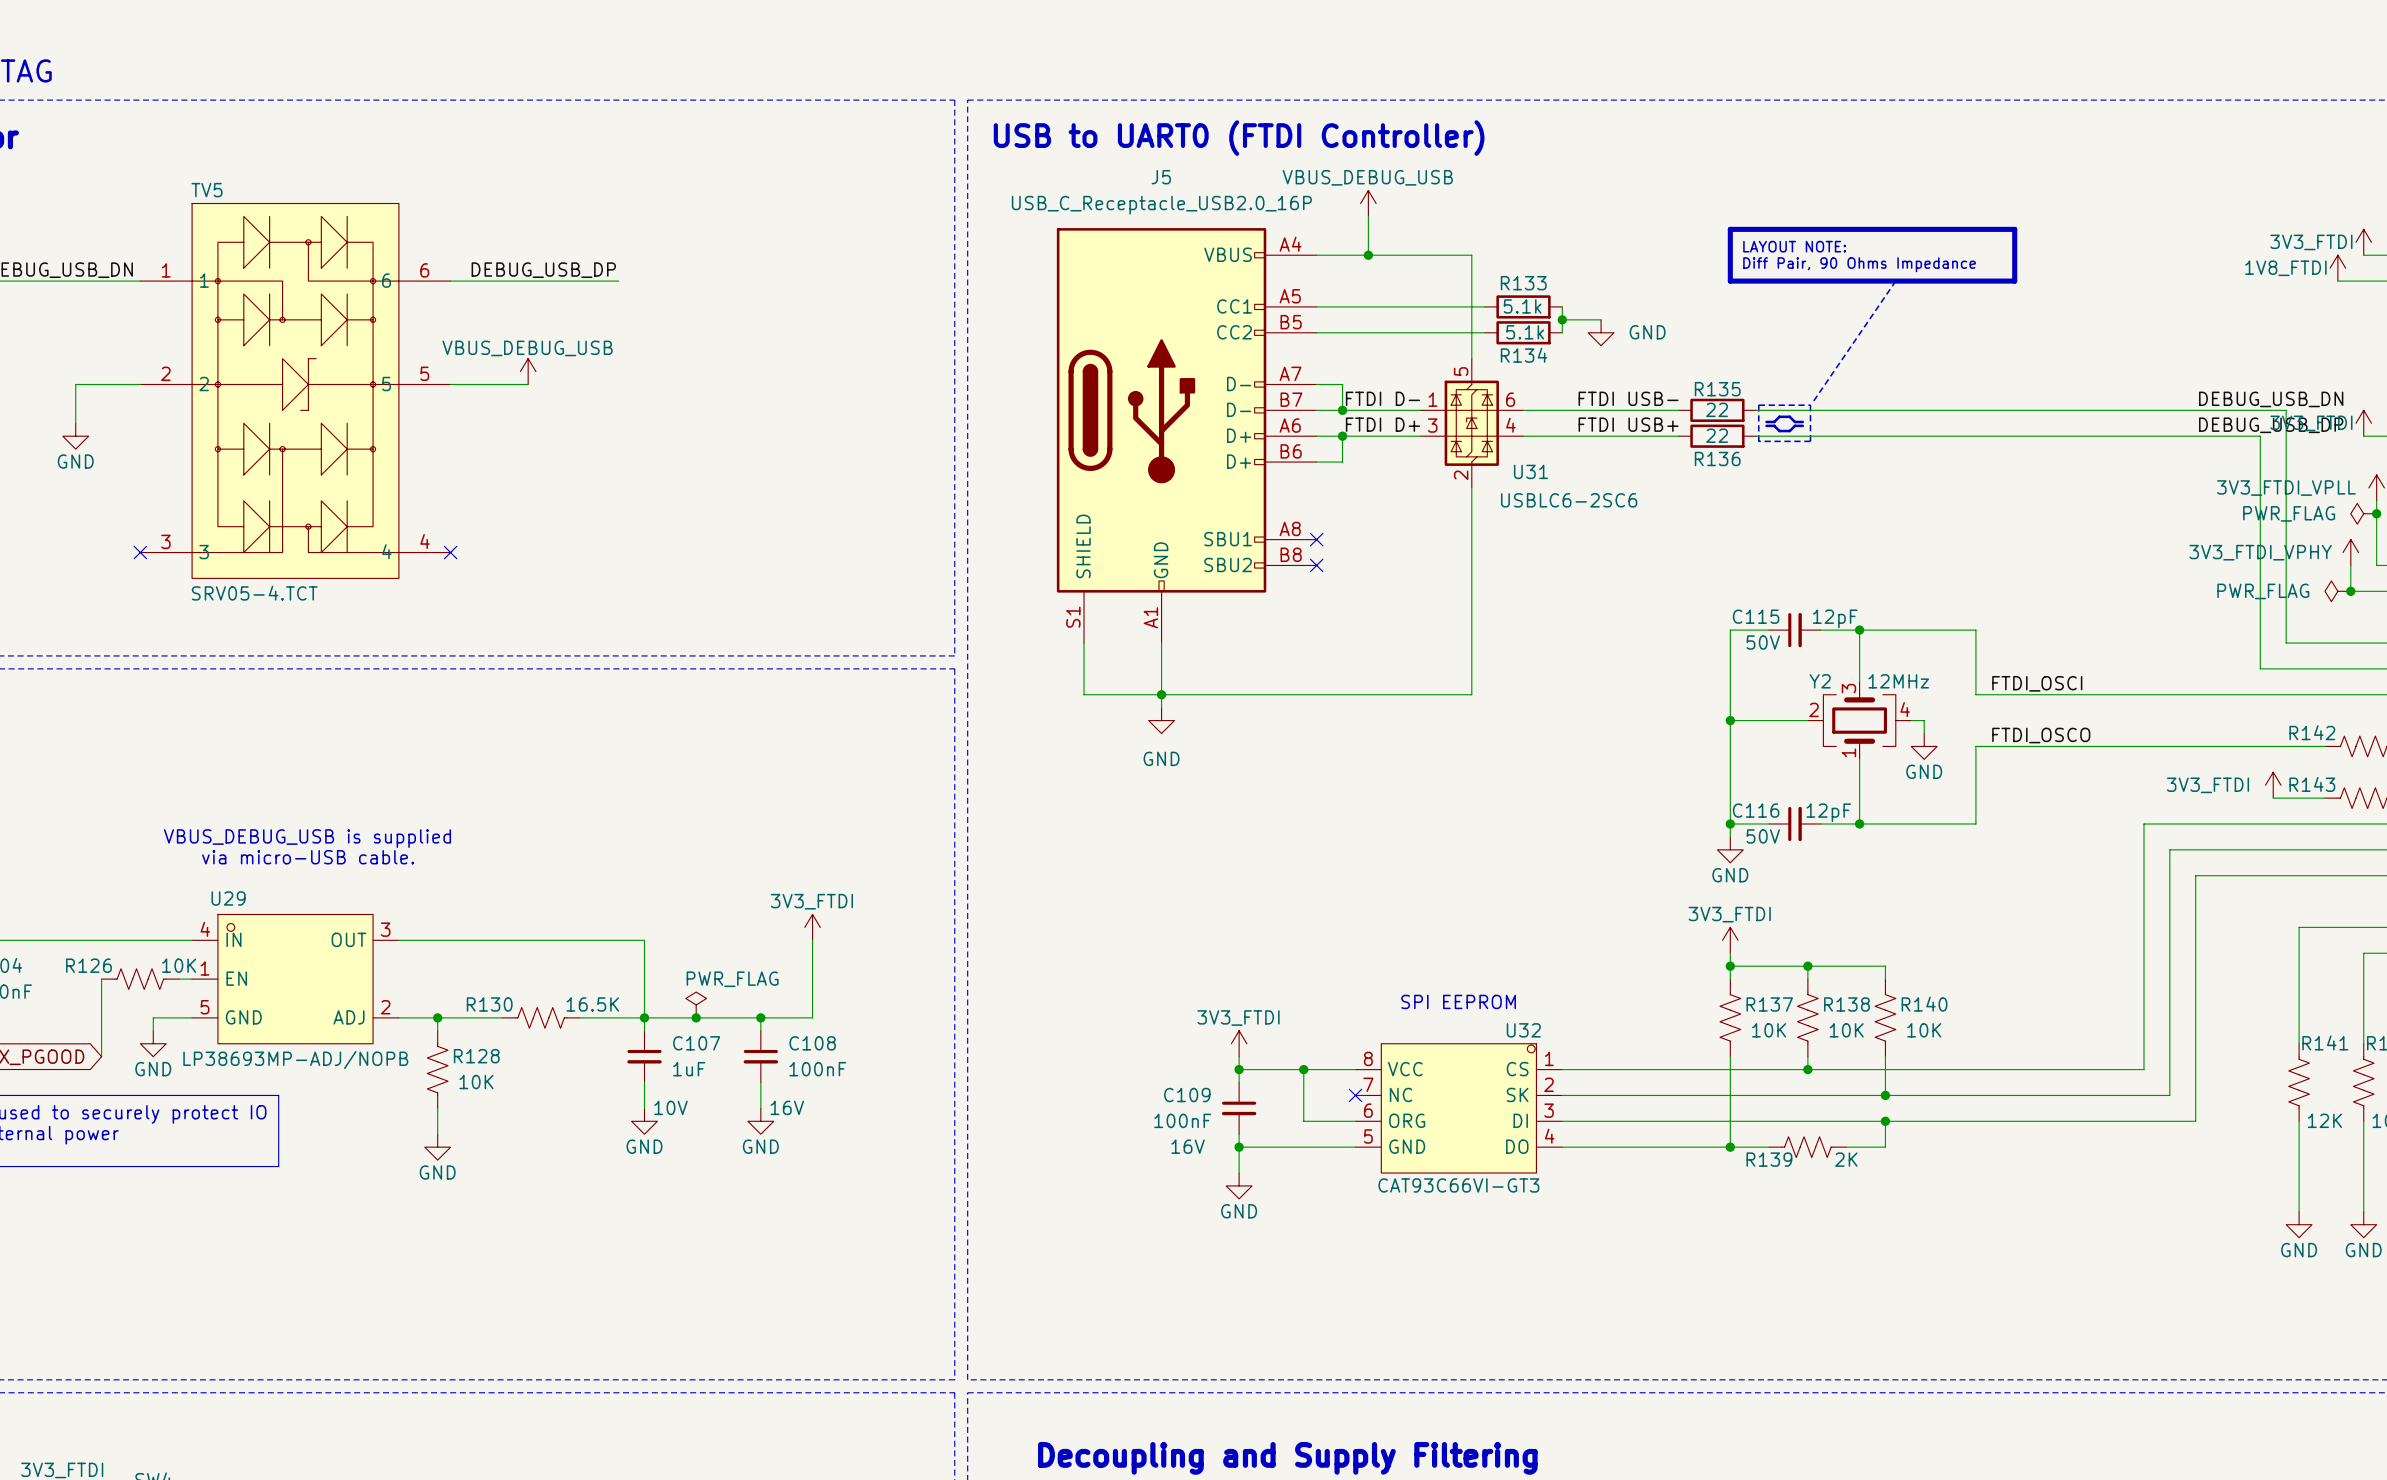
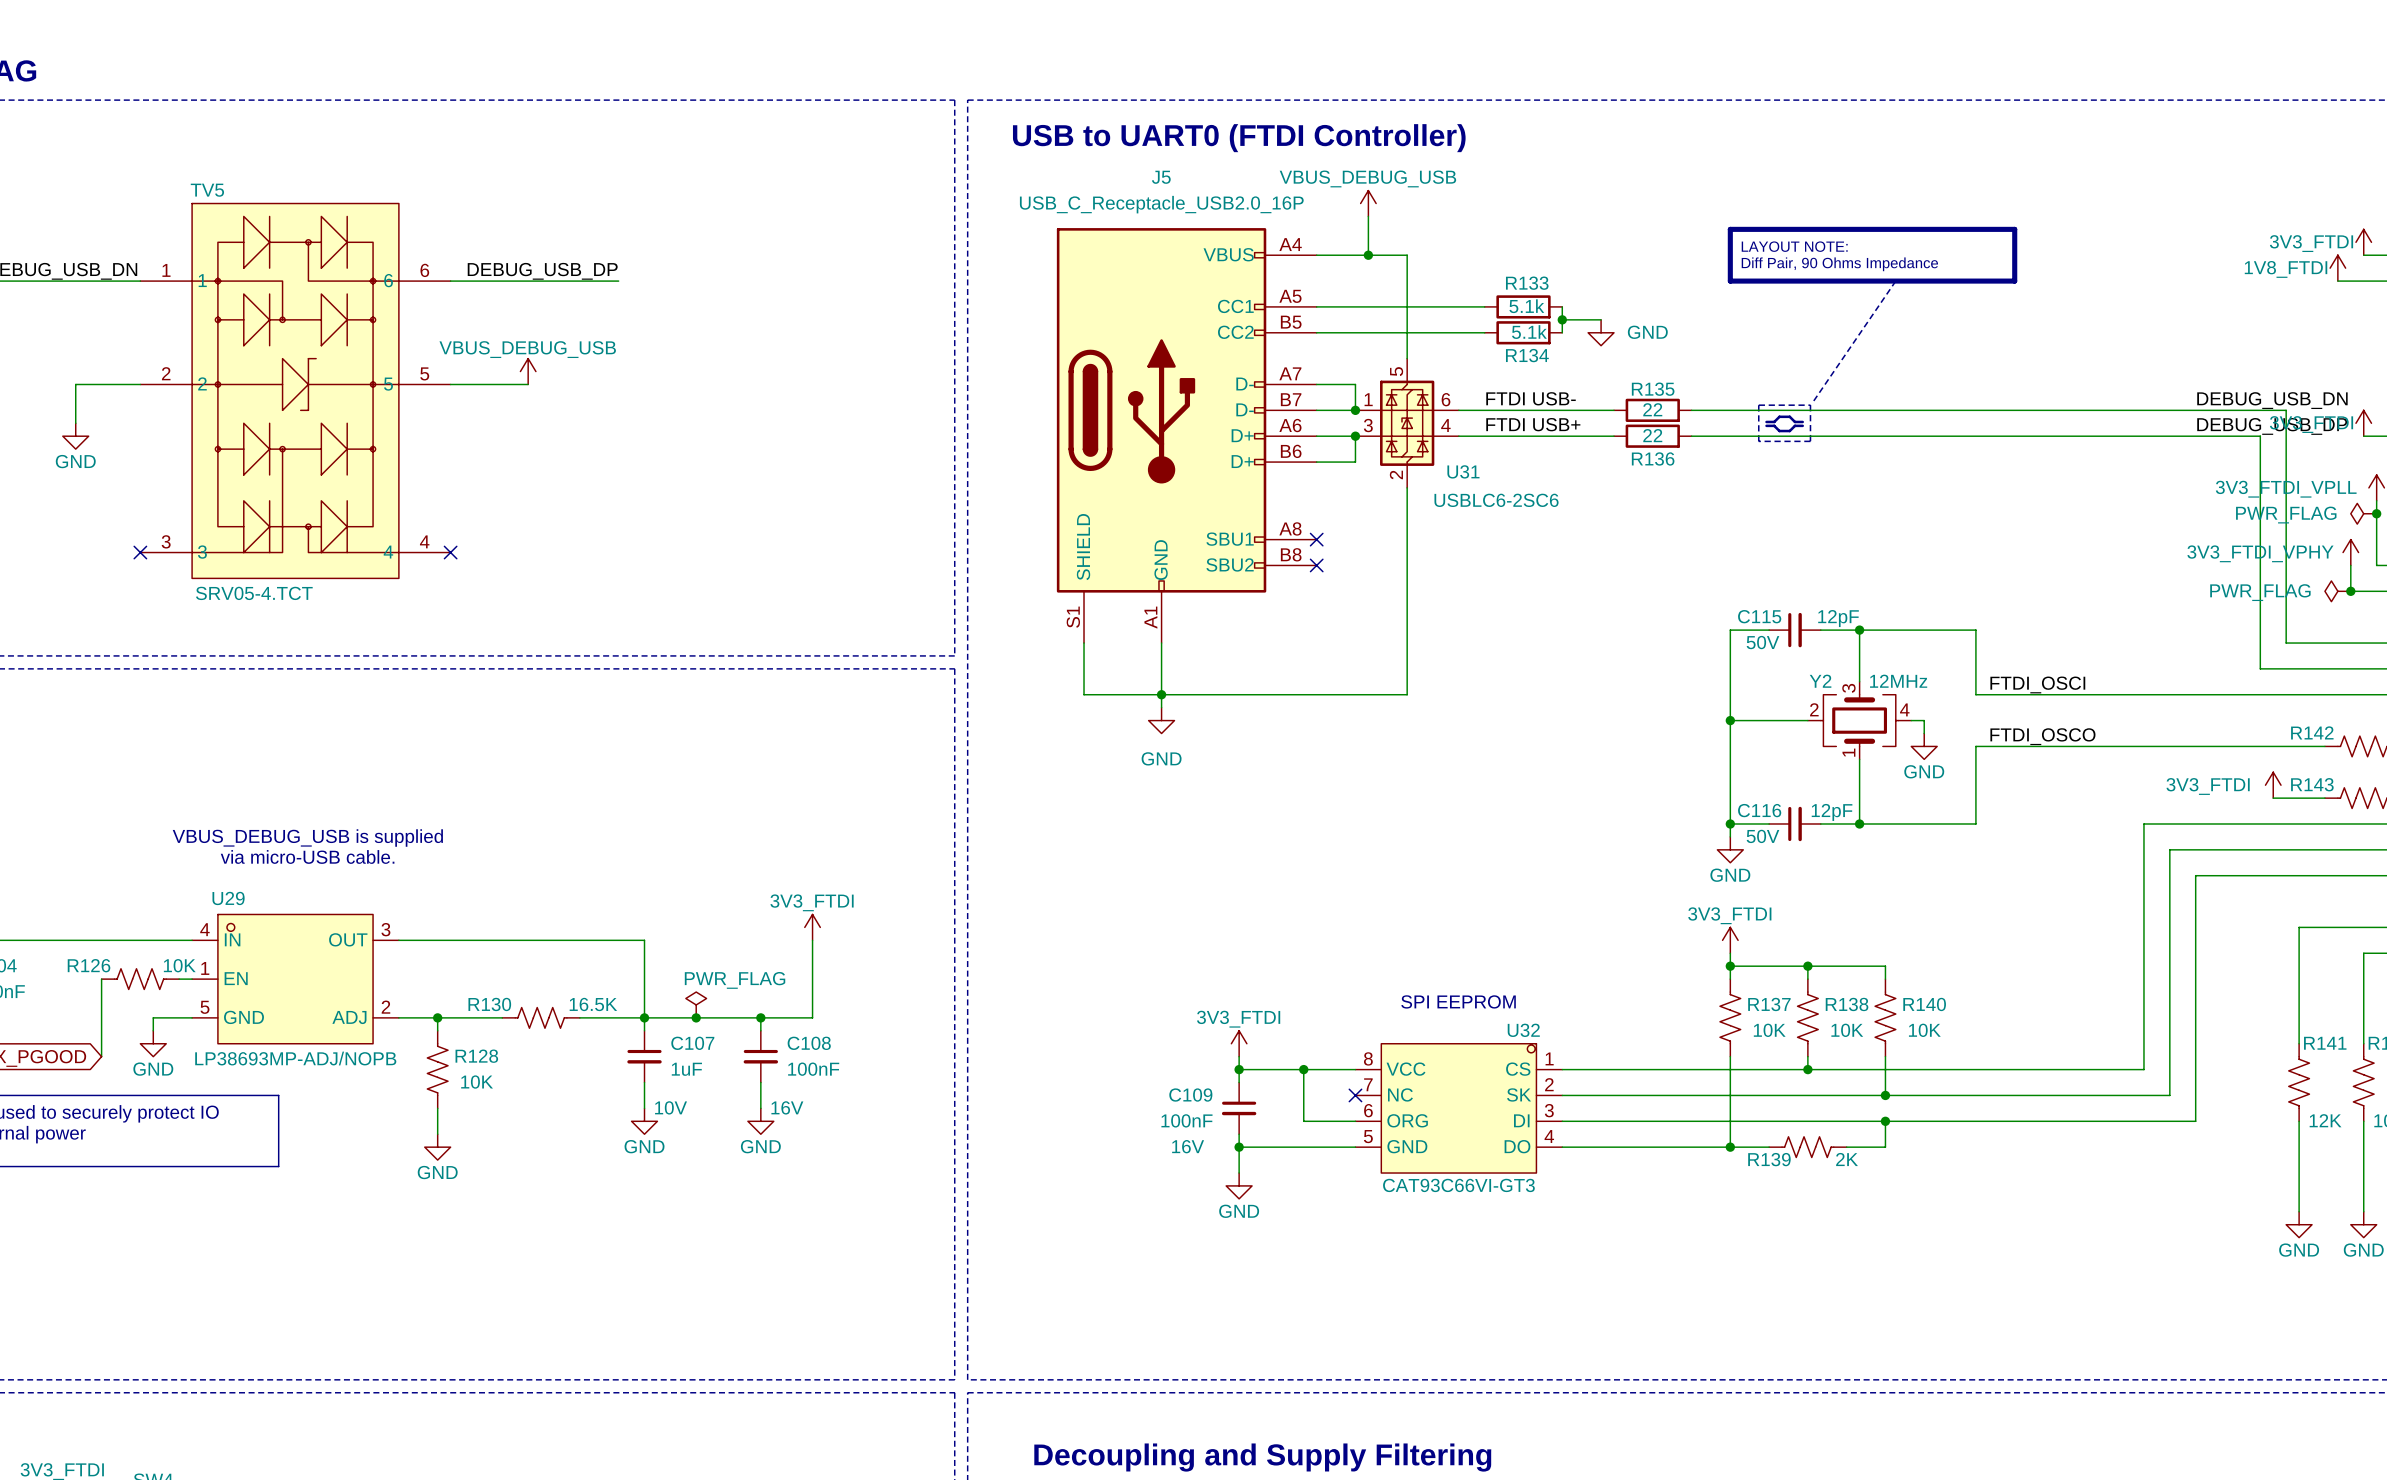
wire: (1407, 255) (1471, 255) (1471, 358) -> (1407, 255) (1407, 358)
wire: (1342, 384) (1342, 410) -> (1342, 384) (1355, 384) (1355, 410)
label: FTDI D- (1382, 398) -> none
label position: FTDI USB- (1628, 398) -> FTDI USB- (1531, 398)
junction position: (1342, 410) -> (1355, 410)
wire: (1613, 410) (1678, 410) -> (1691, 410) (1756, 410)
R135 position: (1717, 410) -> (1652, 410)
U31 position: (1471, 423) -> (1407, 423)
label: FTDI D+ (1382, 424) -> none
label position: FTDI USB+ (1628, 424) -> FTDI USB+ (1533, 424)
wire: (1342, 436) (1342, 462) -> (1355, 436) (1355, 462) (1342, 462)
junction position: (1342, 436) -> (1355, 436)
wire: (1613, 436) (1678, 436) -> (1691, 436) (1756, 436)
R136 position: (1717, 436) -> (1652, 436)
wire: (1471, 487) (1471, 694) (1407, 694) -> (1407, 487) (1407, 694)

